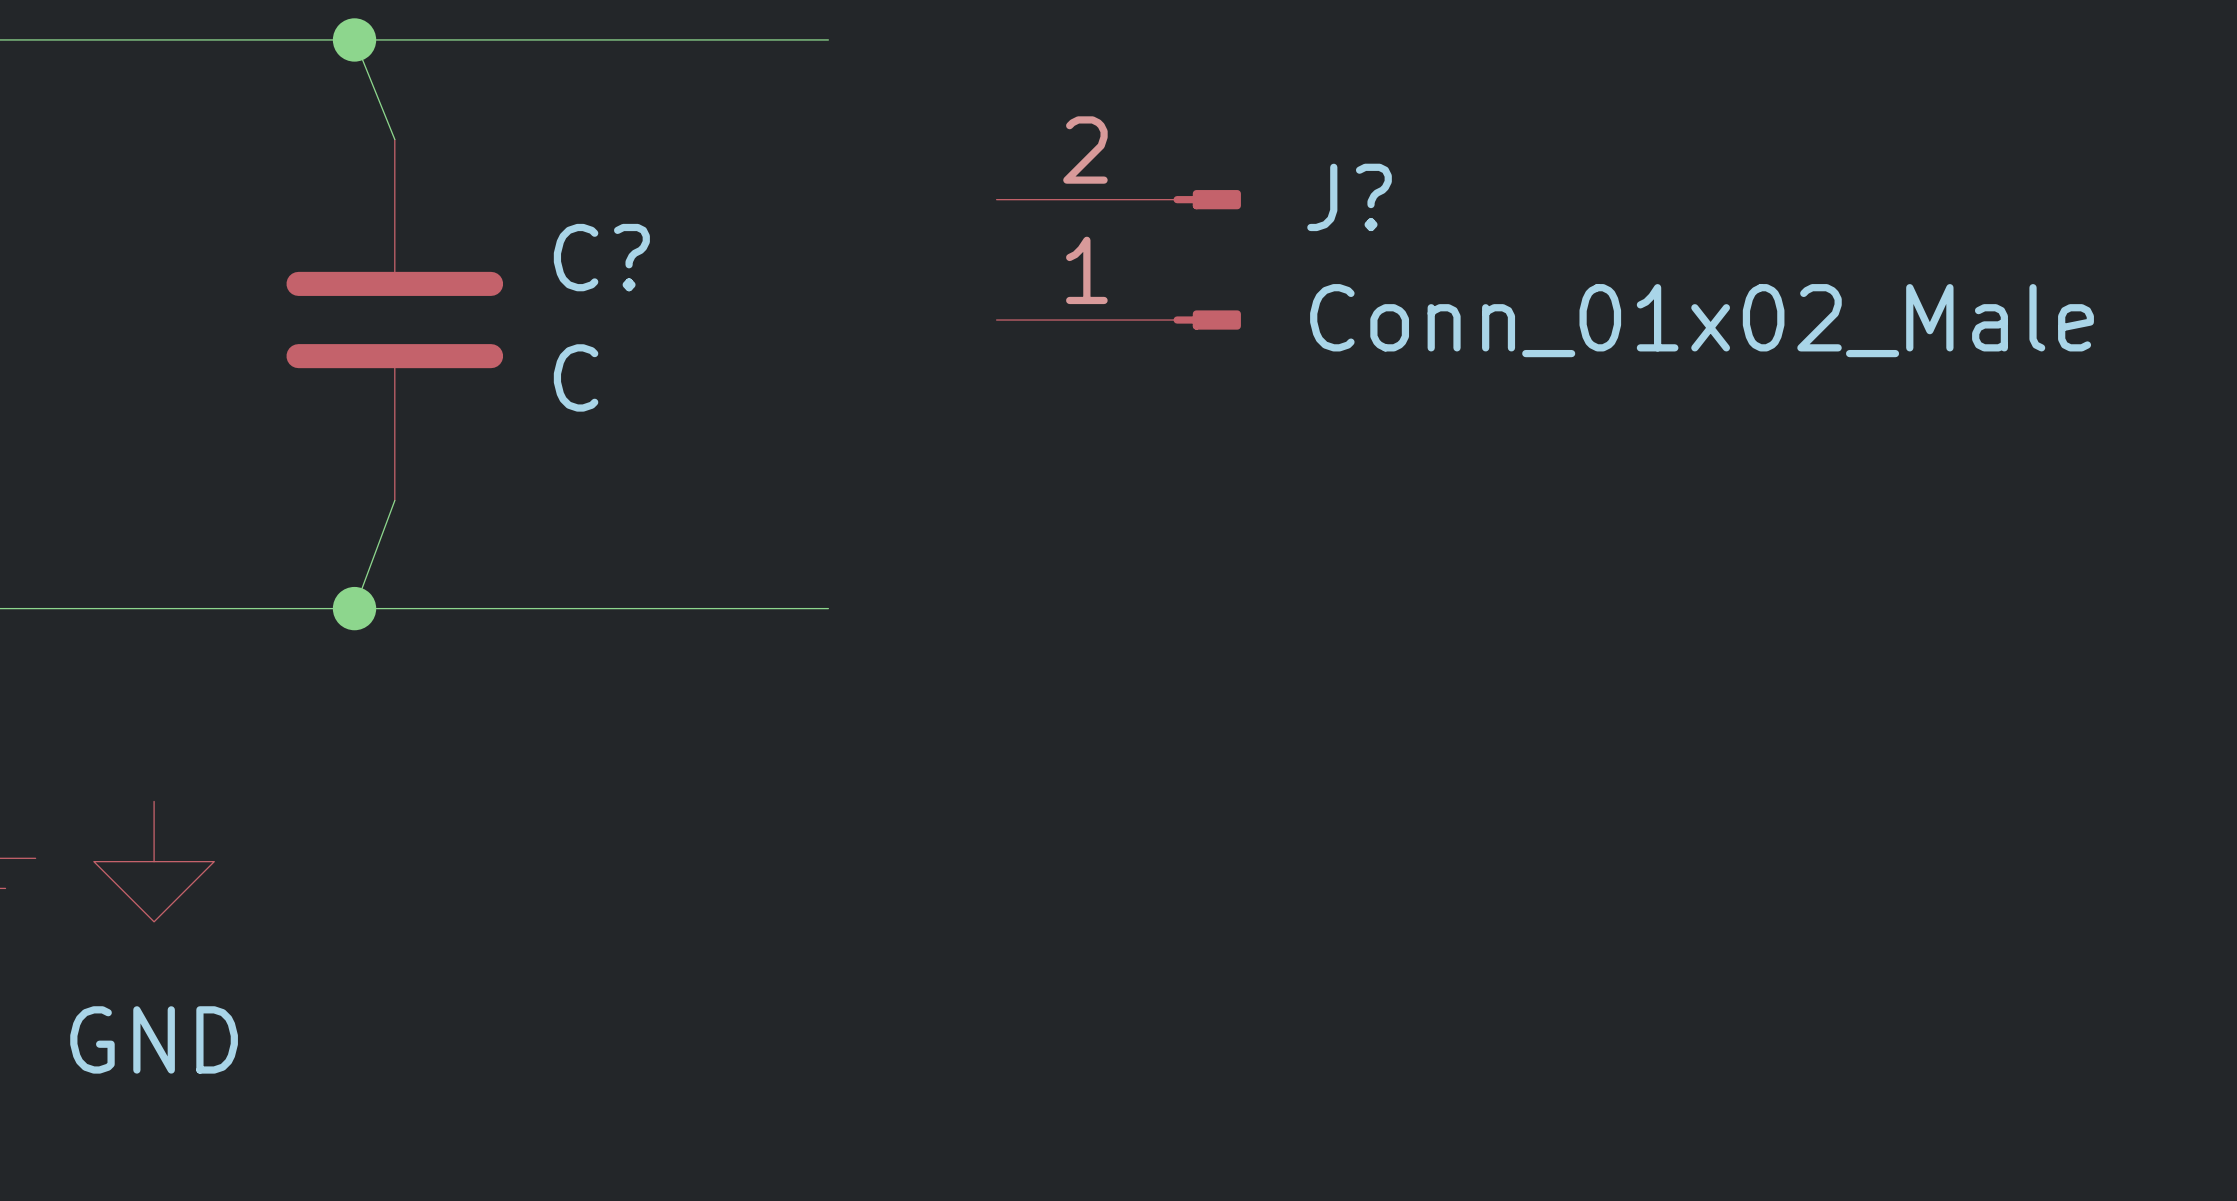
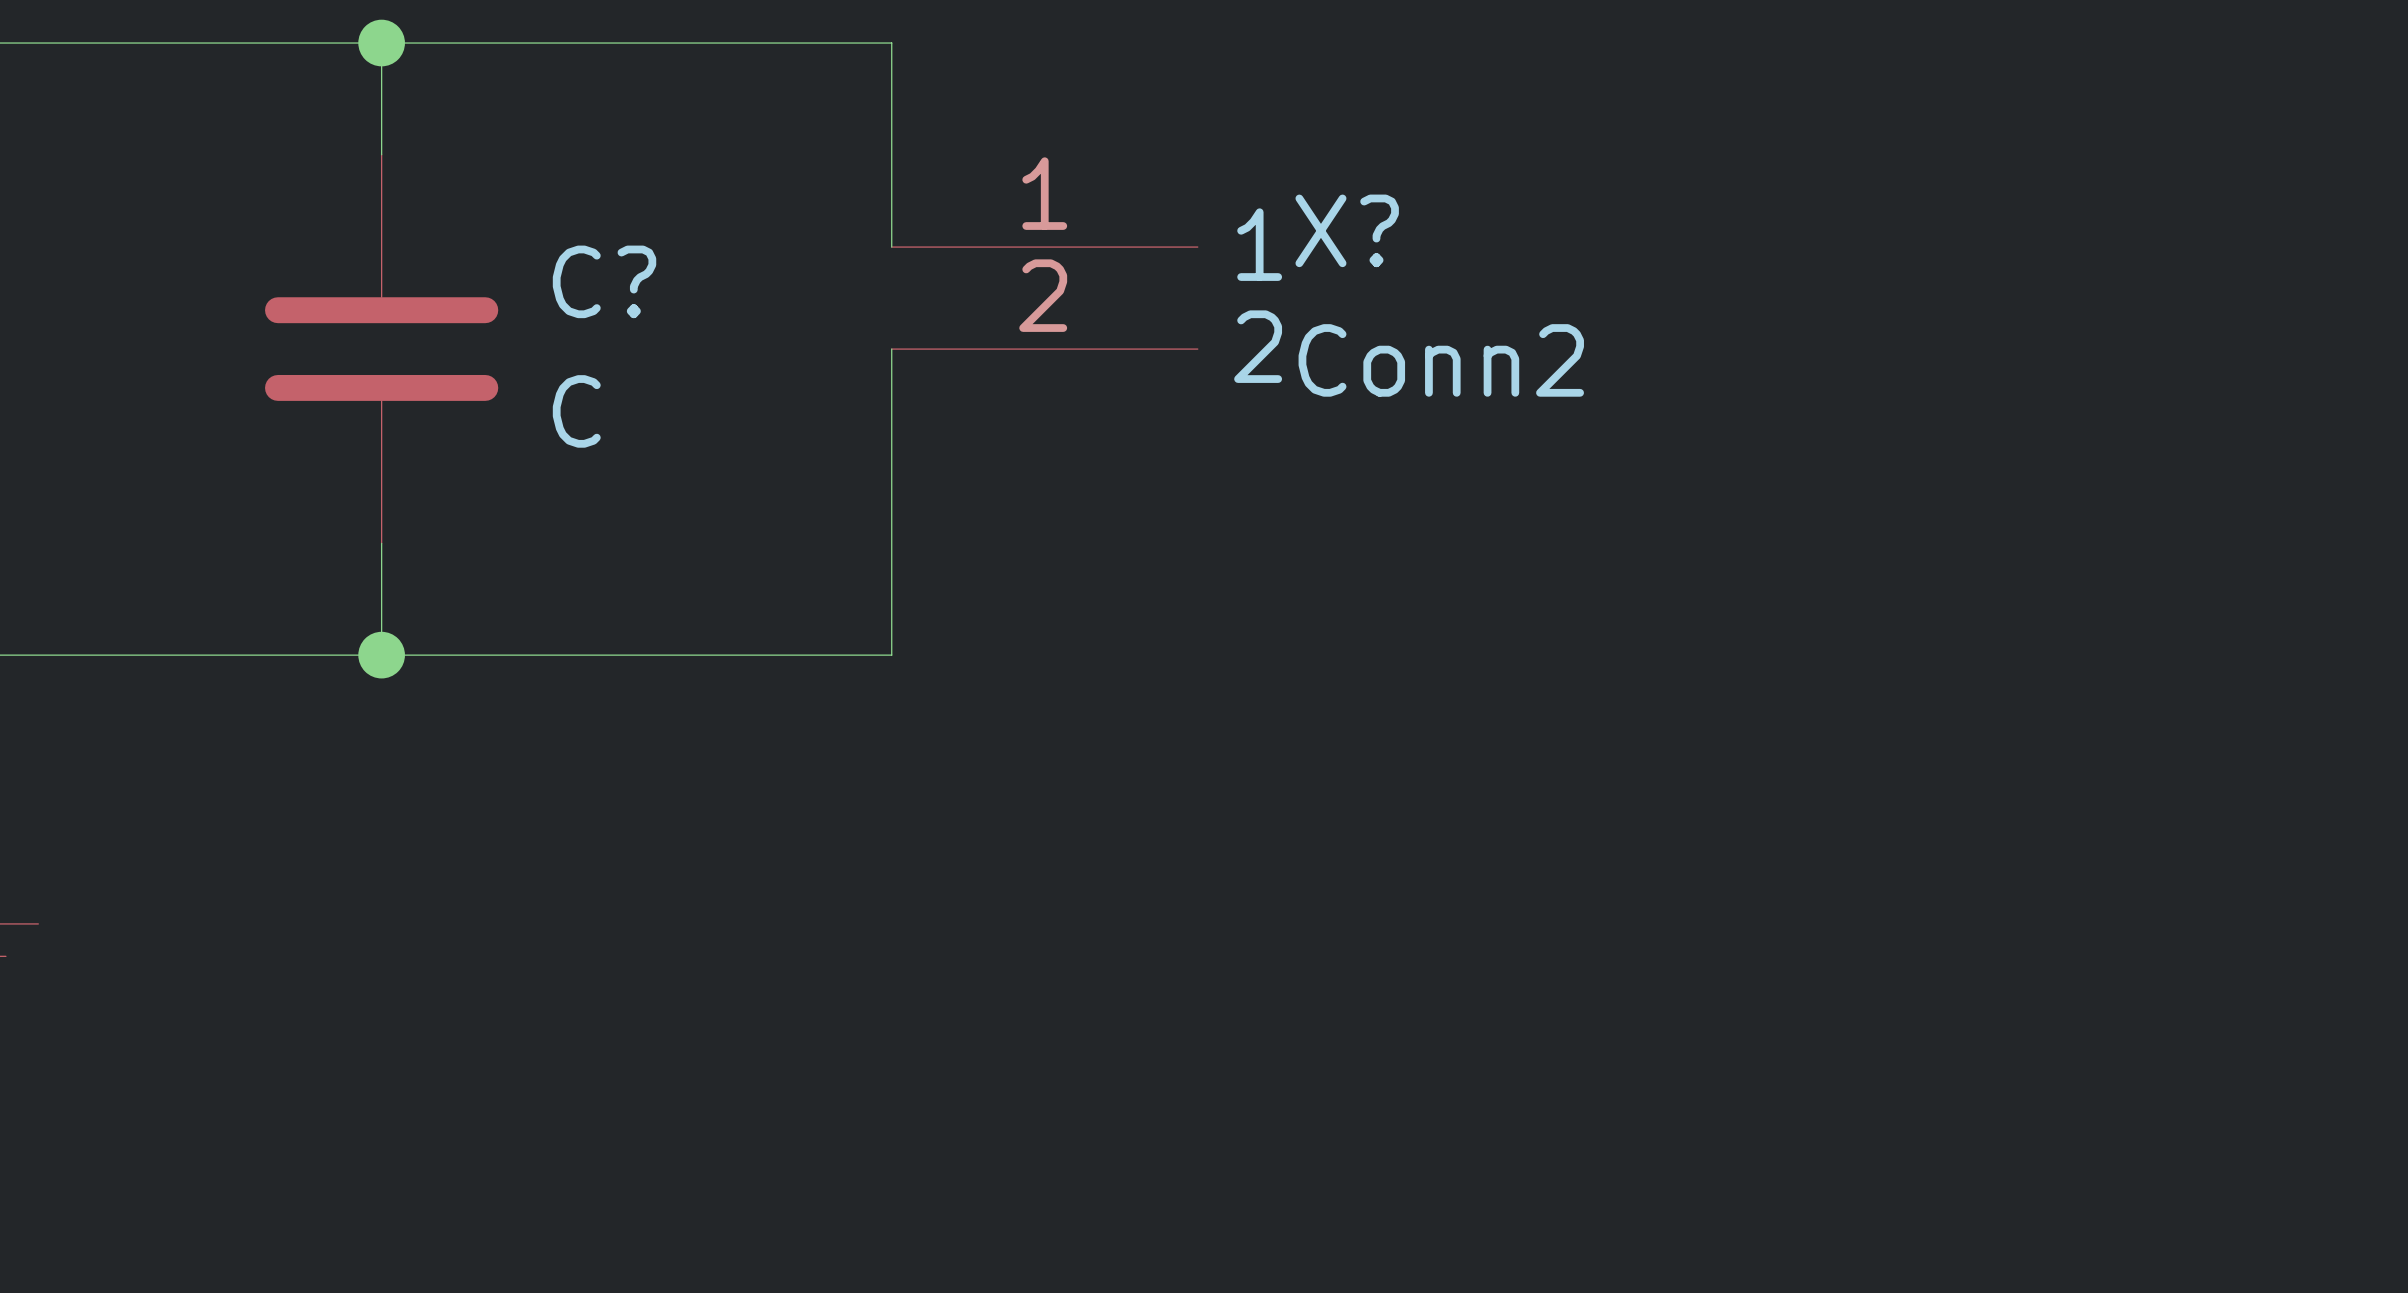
wire: (354, 39) (394, 139) -> (381, 43) (381, 154)
wire: none -> (891, 43) (891, 247)
J?: Conn_01x02_Male (1118, 259) -> none
X?: none -> Conn2 (1044, 298)
C? position: (394, 320) -> (381, 349)
wire: none -> (891, 349) (891, 655)
wire: (394, 500) (354, 608) -> (381, 543) (381, 655)
power symbol: GND (154, 861) -> none

